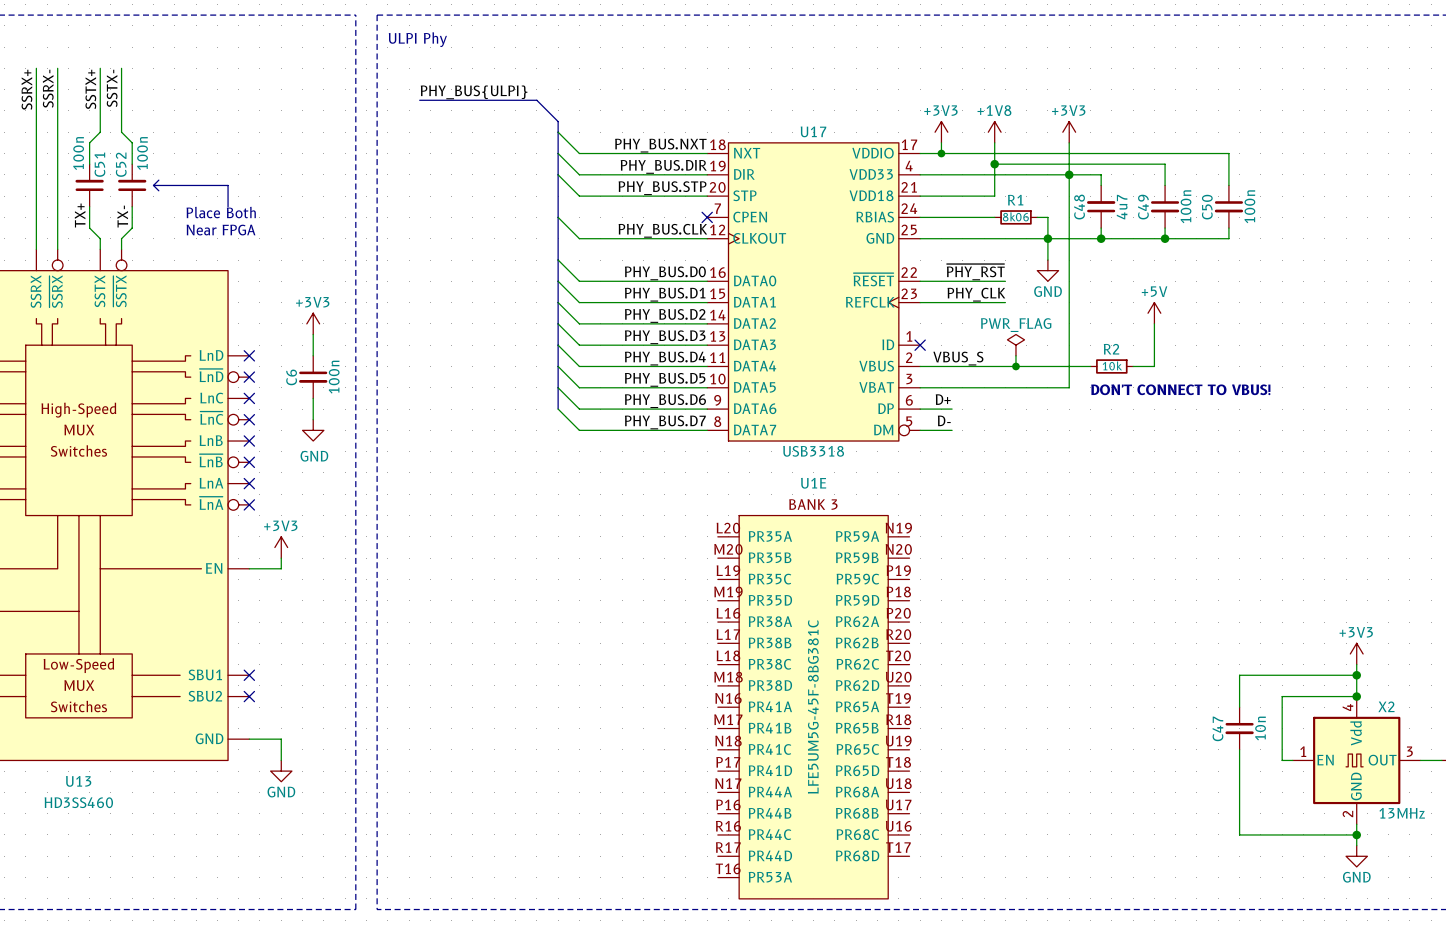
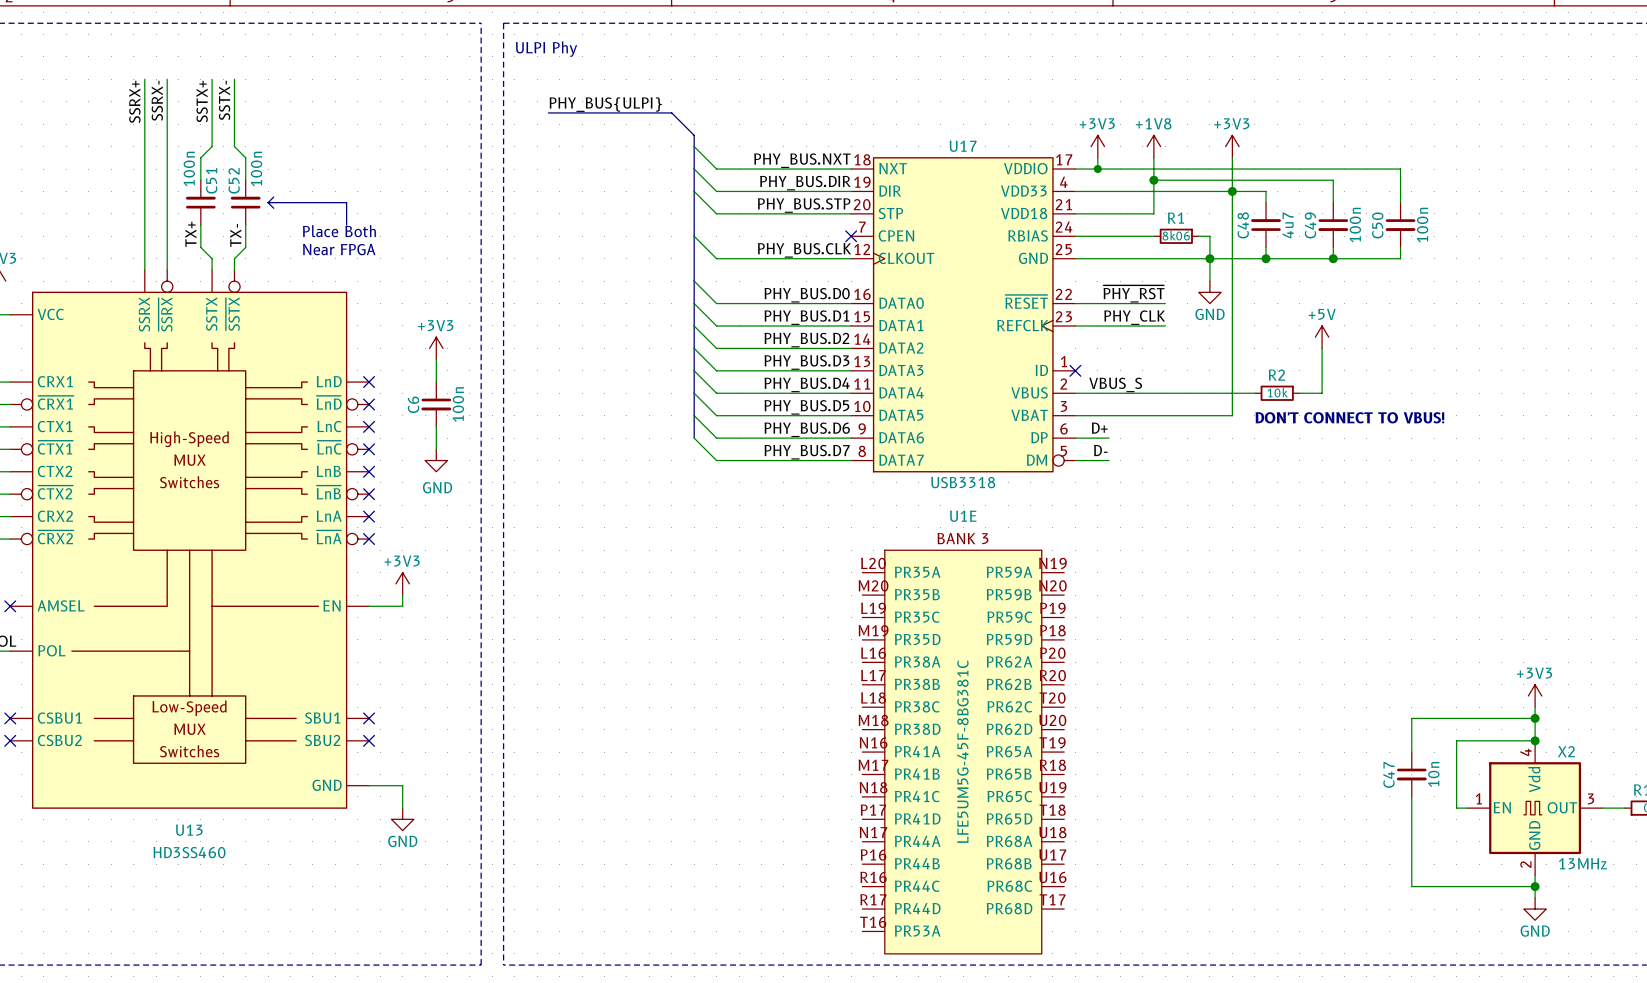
power symbol: PWR_FLAG (1015, 345) -> none
wire: (1015, 355) (1015, 366) -> none
junction: (1015, 366) -> none

